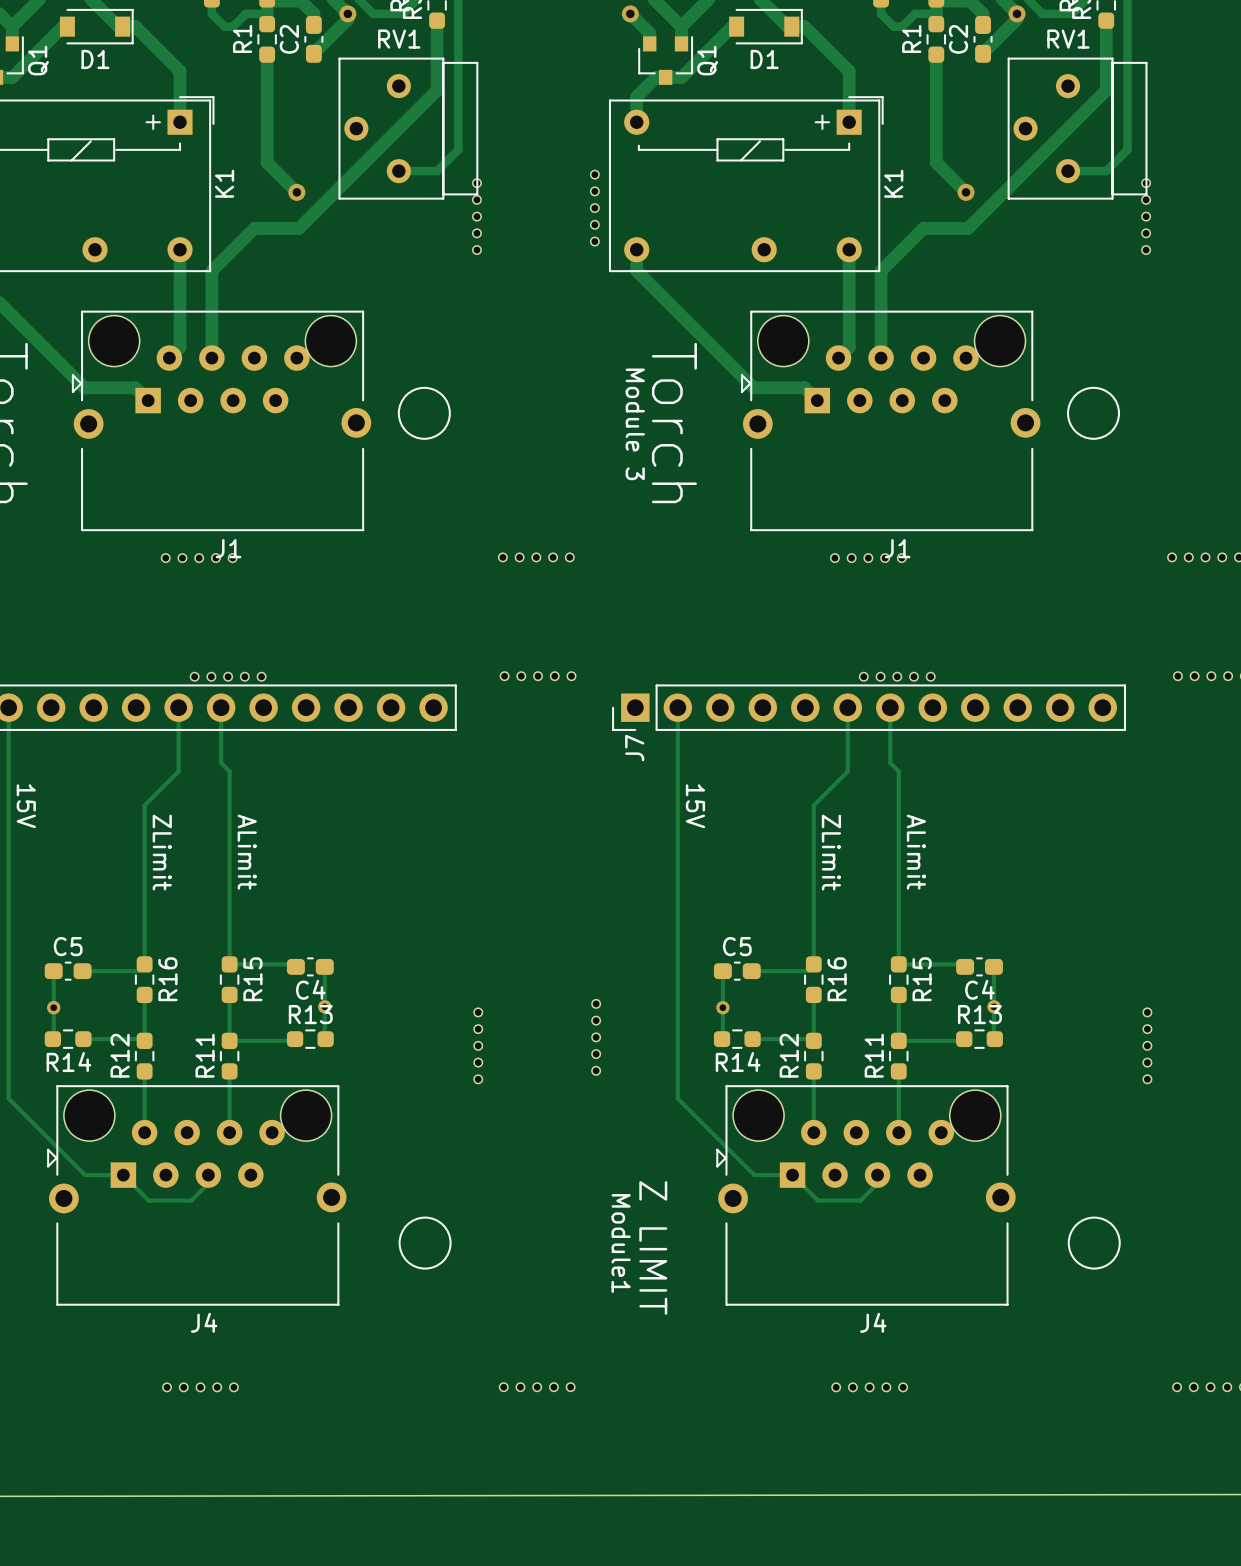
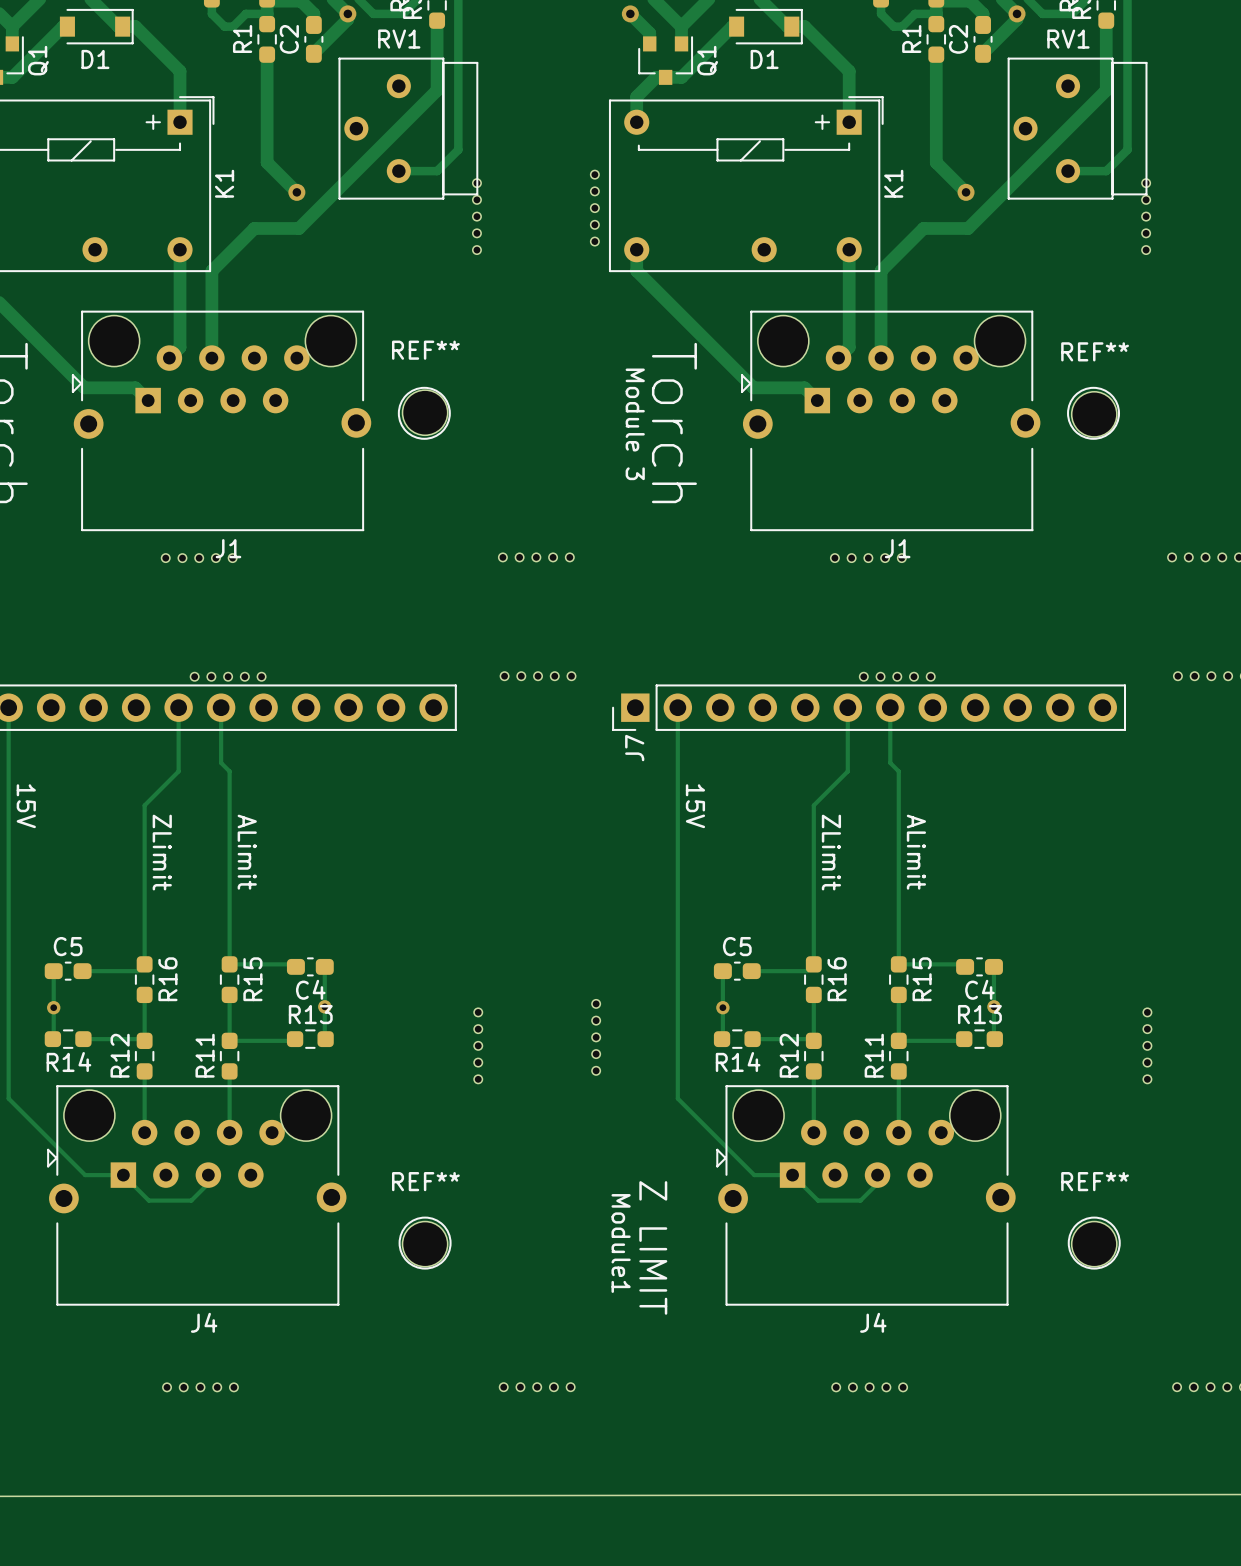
REF**: none -> (425, 412)
REF**: none -> (1094, 414)
REF**: none -> (425, 1244)
REF**: none -> (1094, 1244)

